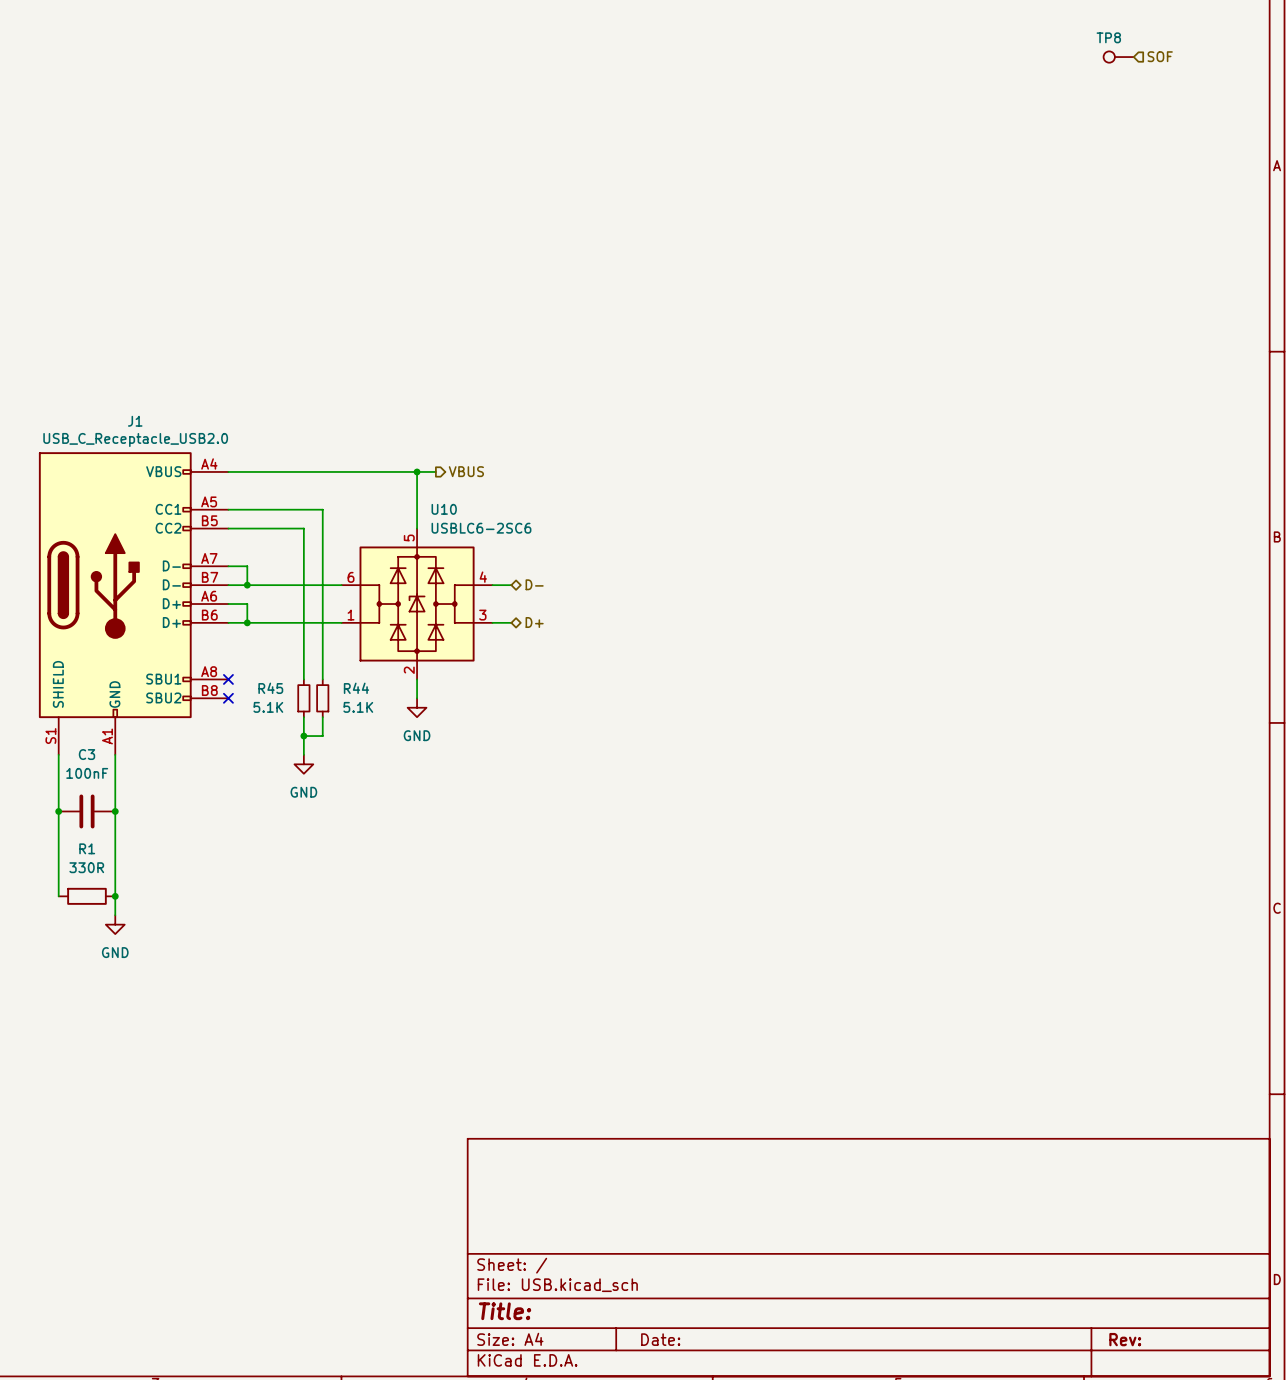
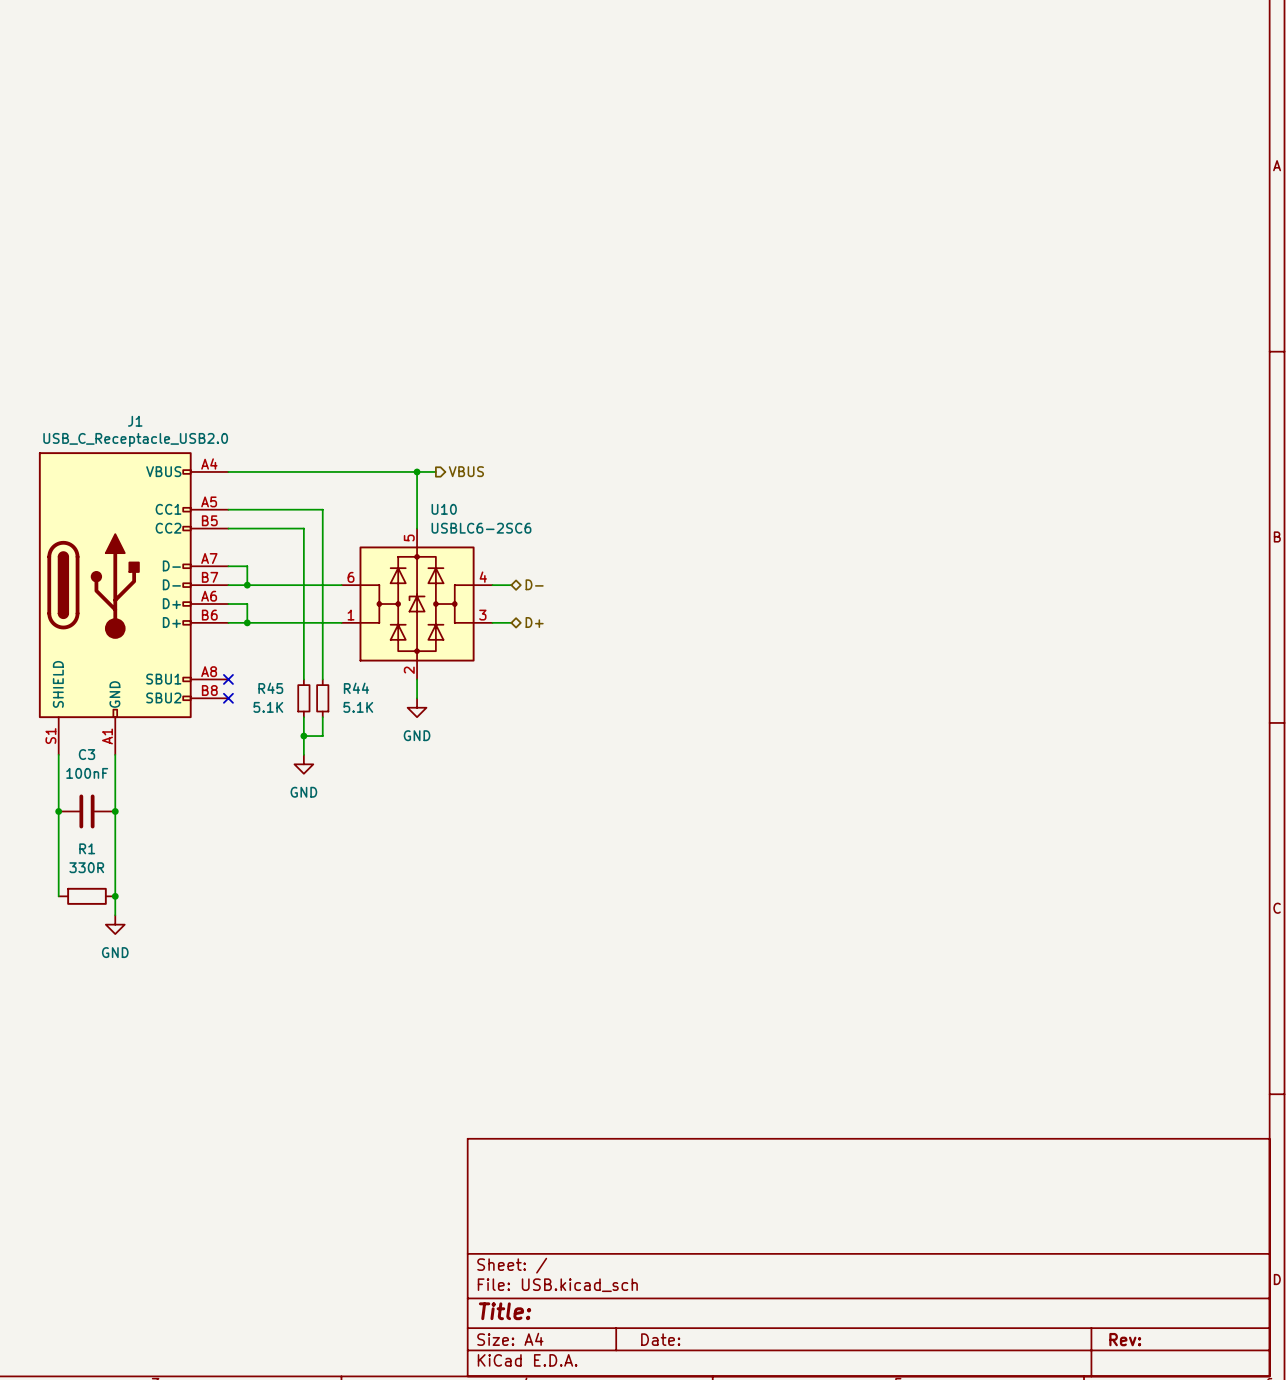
hierarchical label: SOF (1160, 56) -> none
TP8: (1118, 57) -> none

